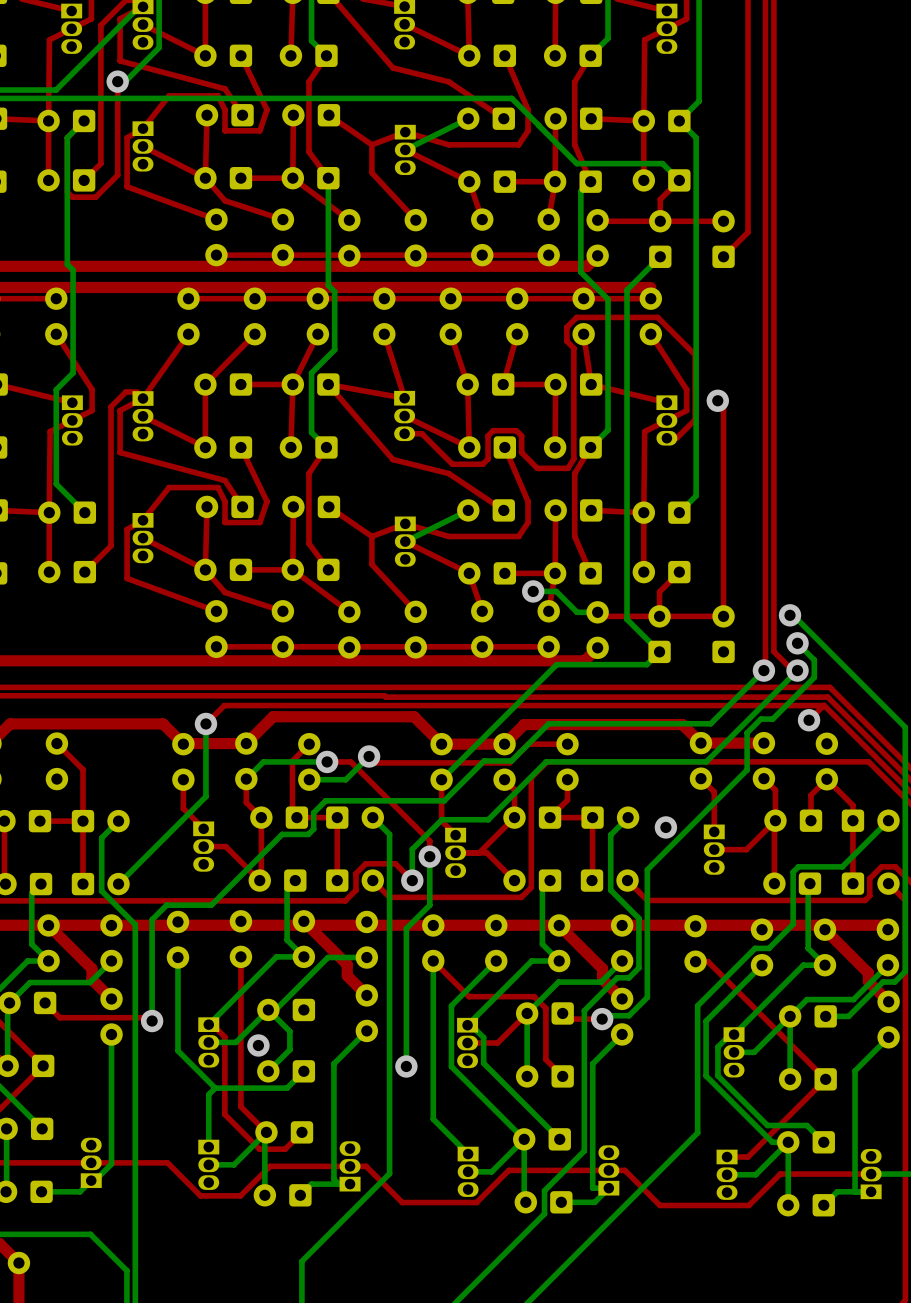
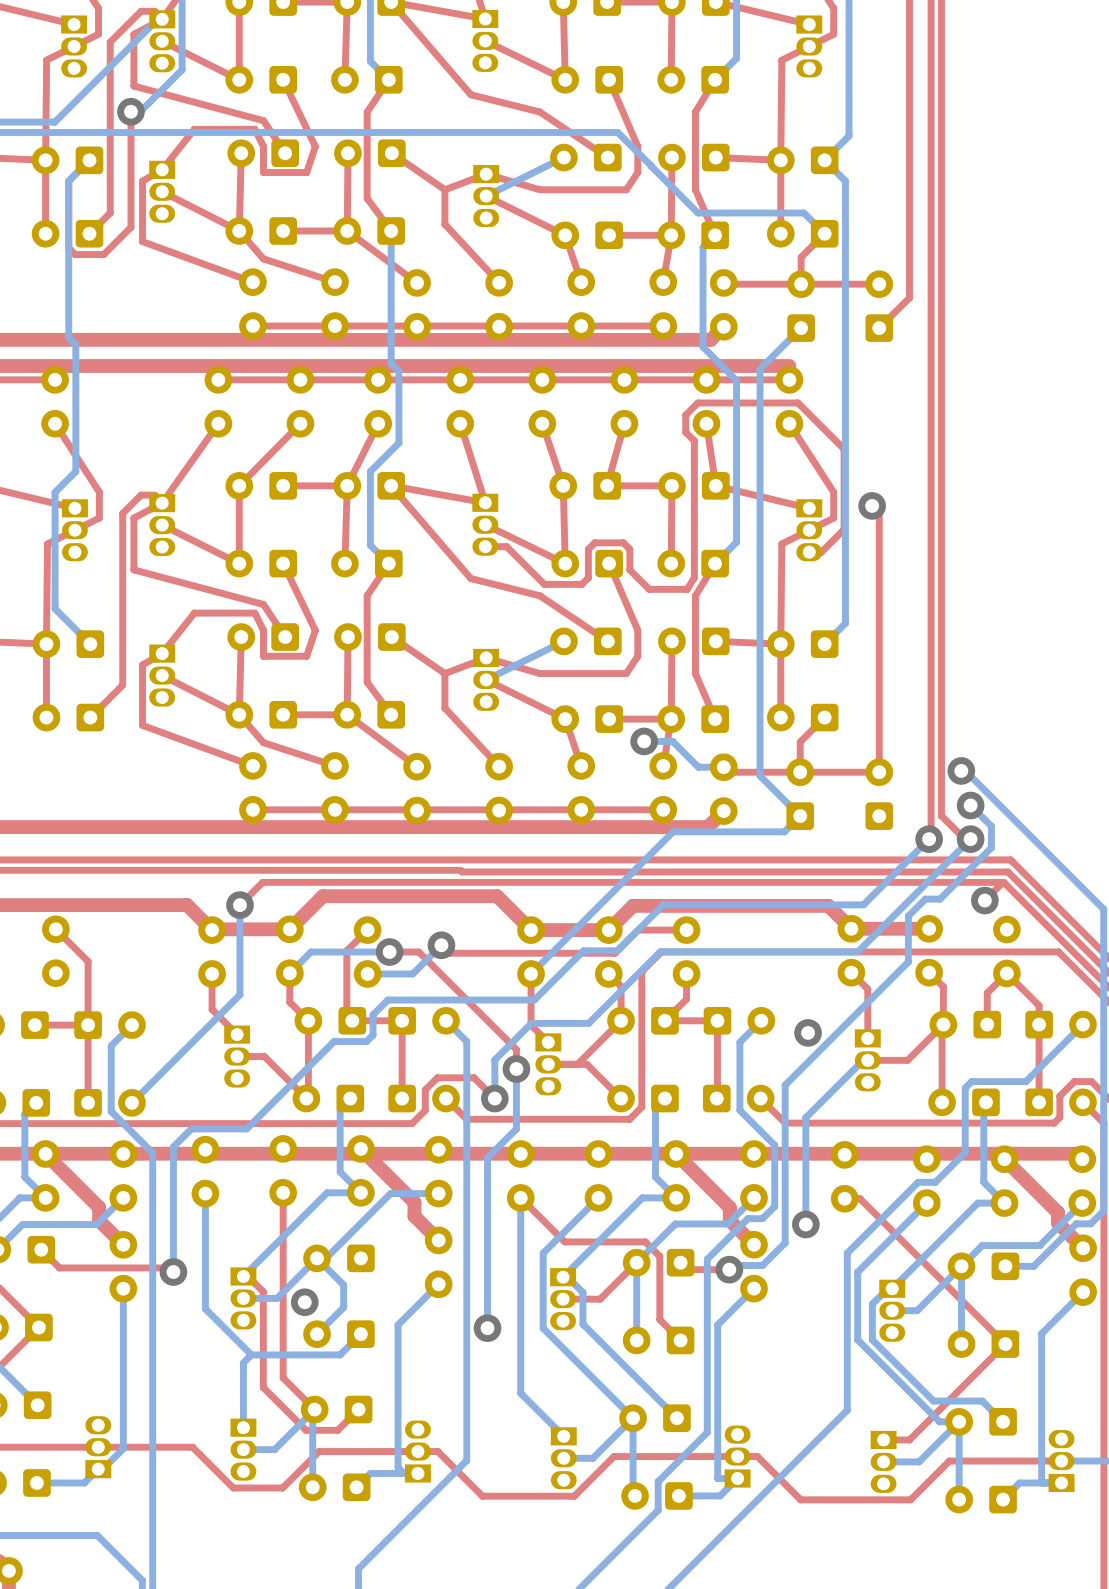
bottom track: none -> (867, 1060) (863, 1060) (805, 1117) (805, 1224)
via: none -> (805, 1224)

